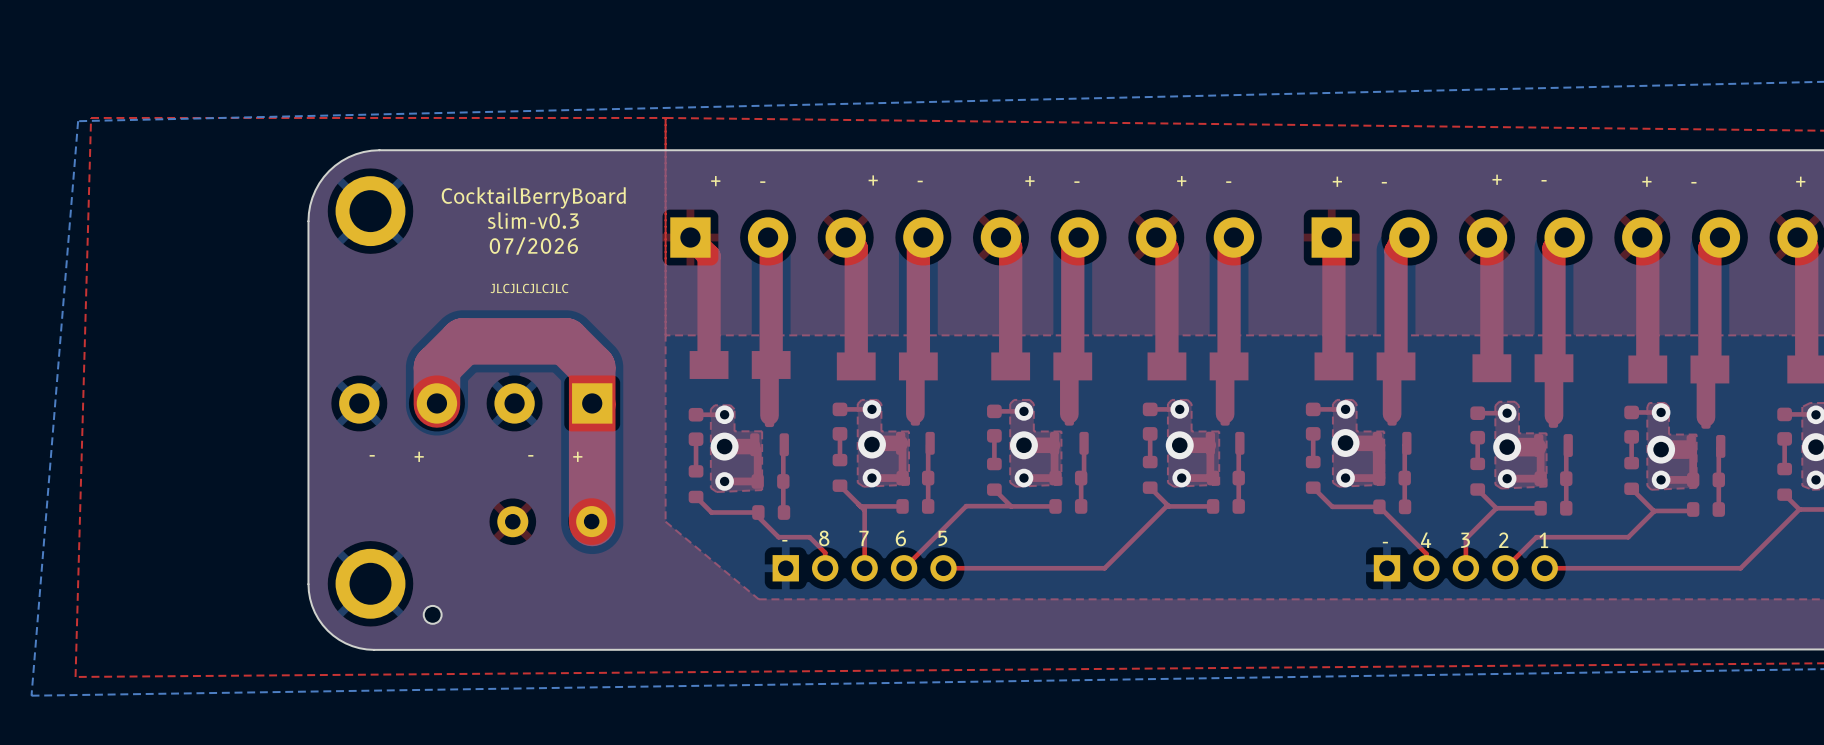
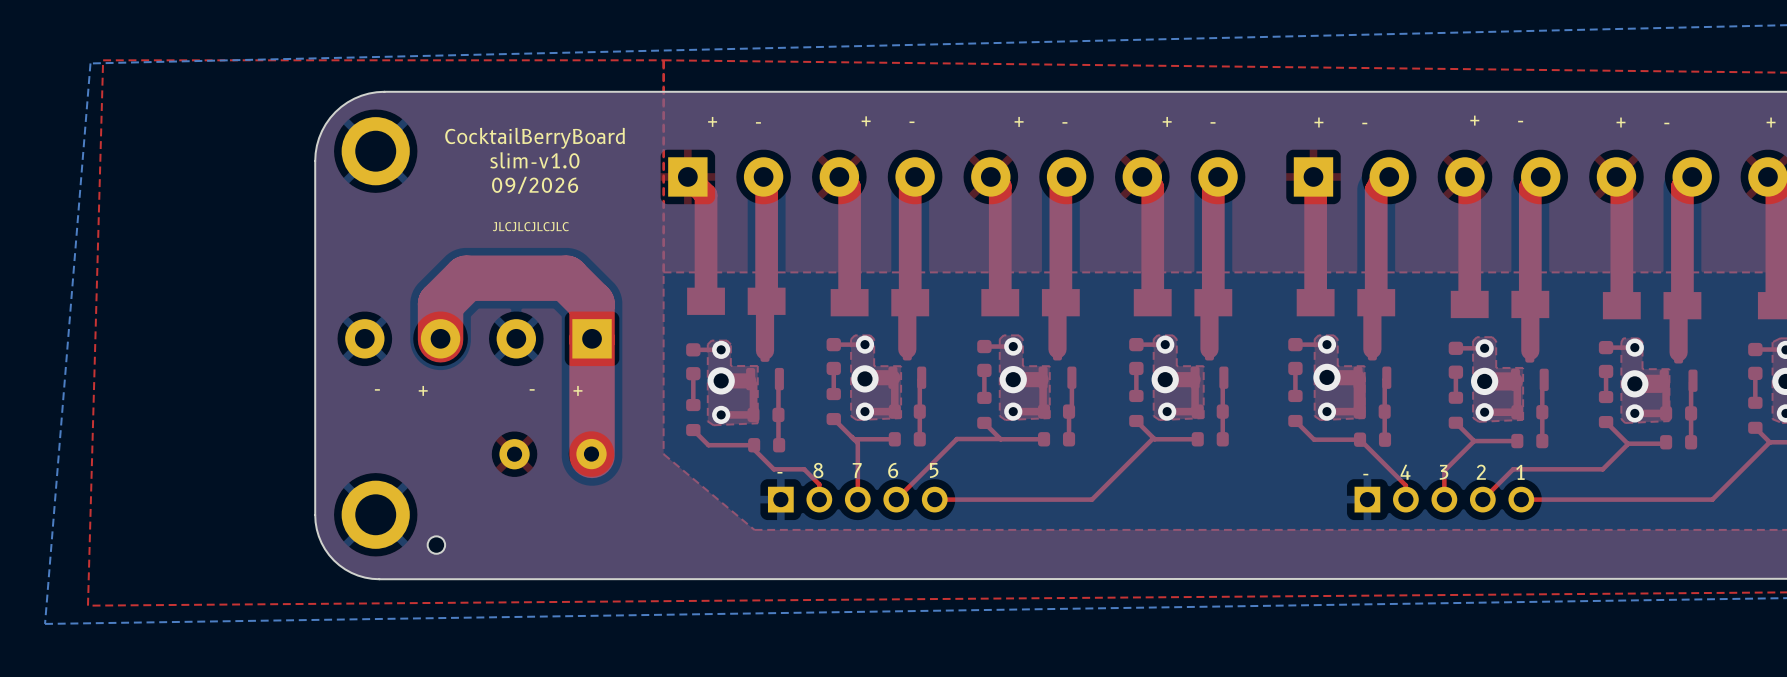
text: slim-v0.3 (533, 220) -> slim-v1.0 (534, 160)
text: 07/2026 (533, 246) -> 09/2026 (535, 185)

